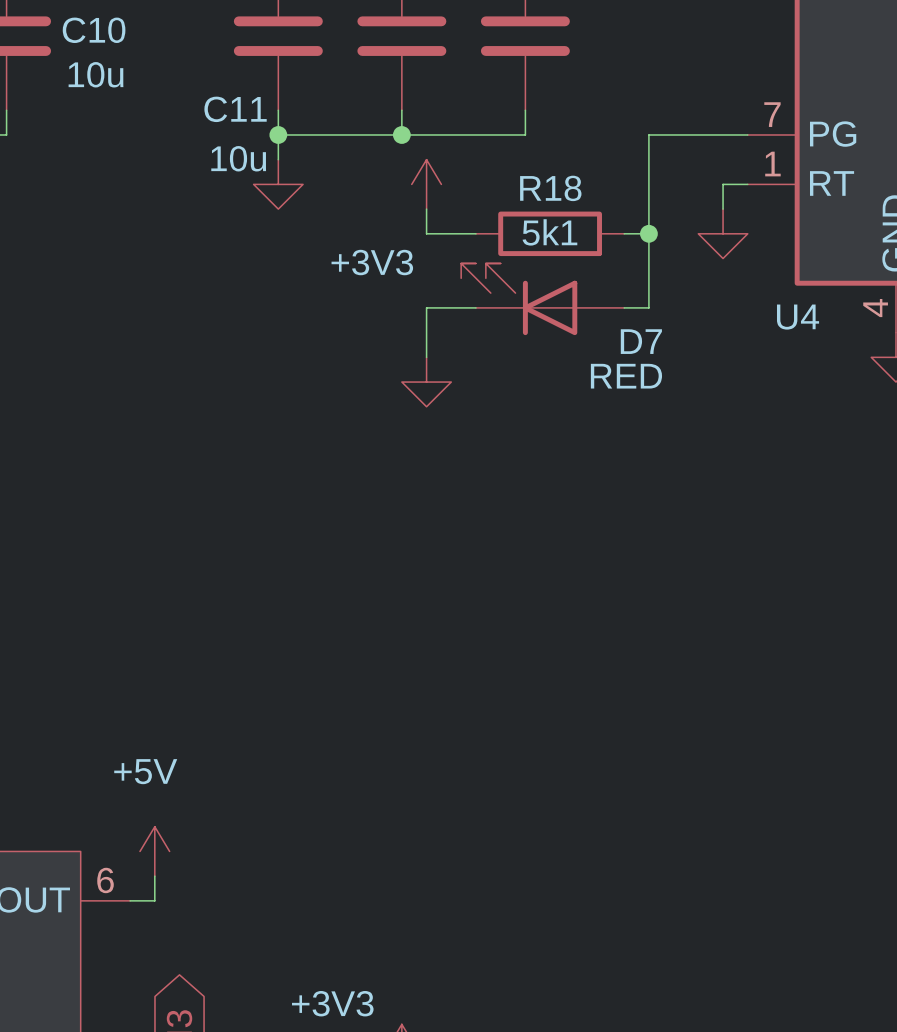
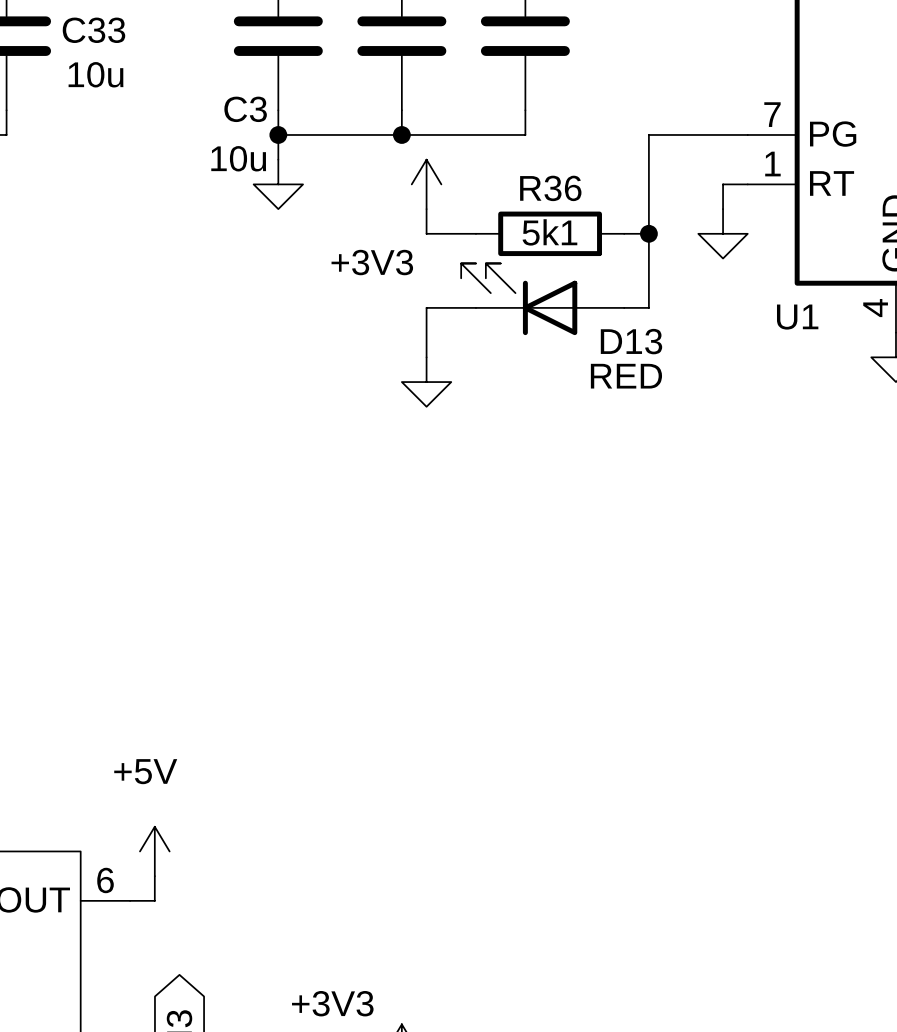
C10 name: C10 (94, 30) -> C33 (93, 30)
C11 name: C11 (235, 109) -> C3 (245, 109)
R18 name: R18 (550, 188) -> R36 (550, 188)
U4 name: U4 (798, 317) -> U1 (797, 317)
D7 name: D7 (641, 341) -> D13 (631, 341)

